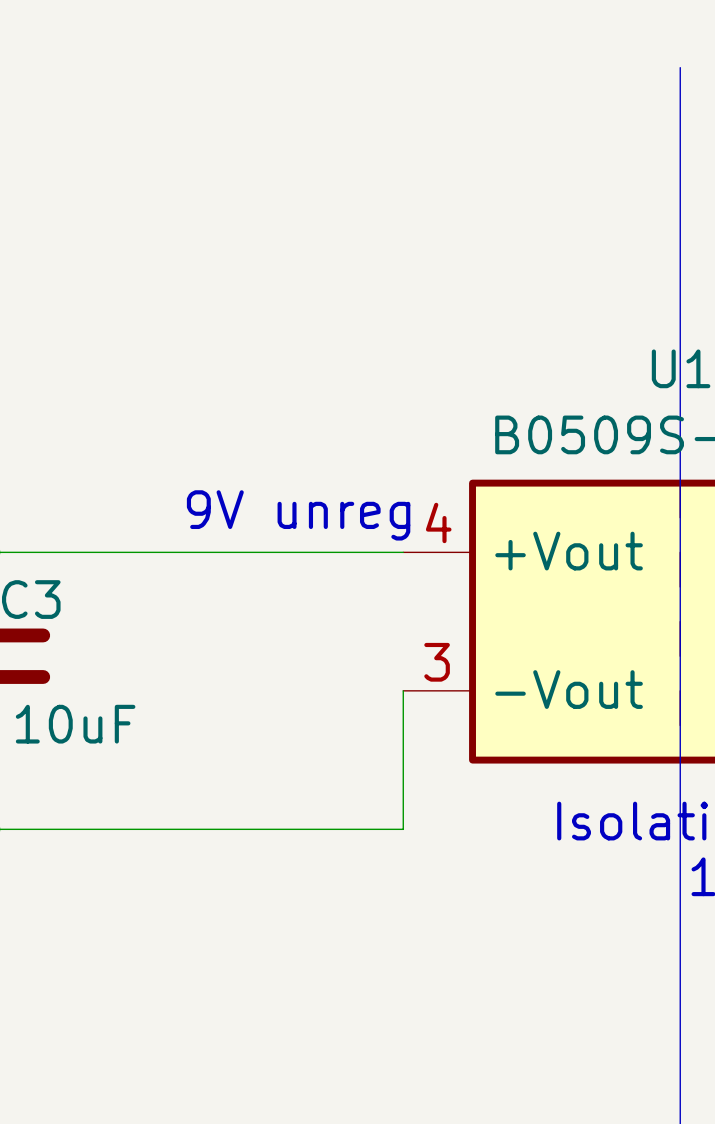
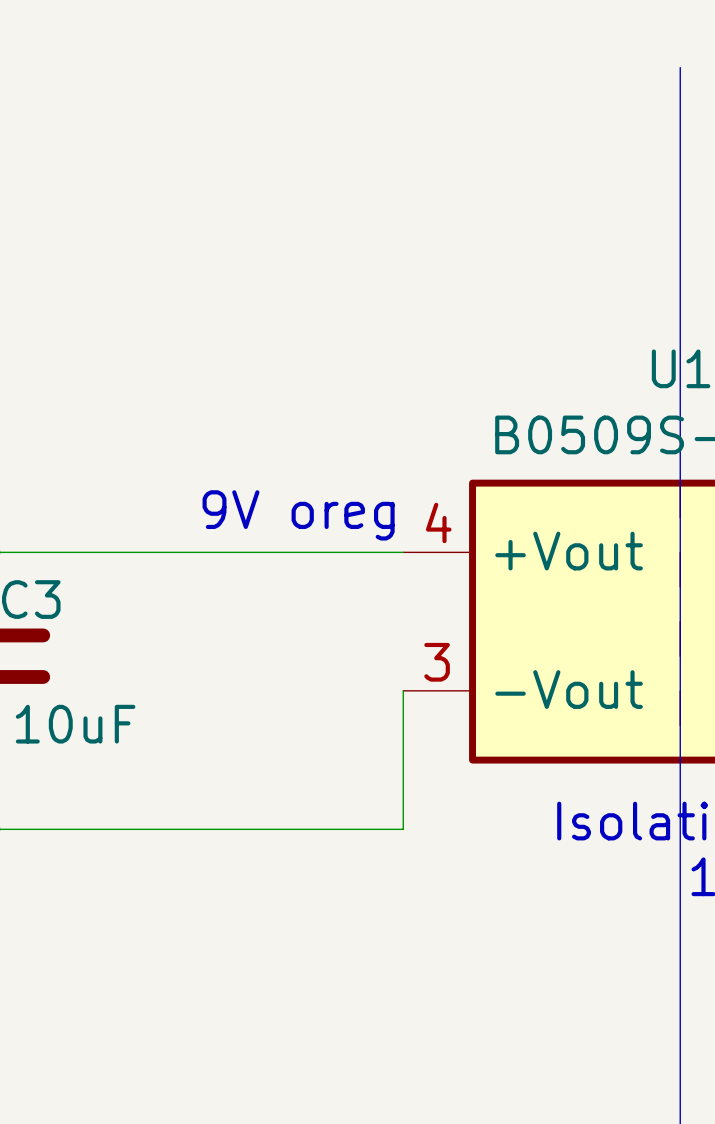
text: 9V unreg (298, 515) -> 9V oreg (298, 515)

